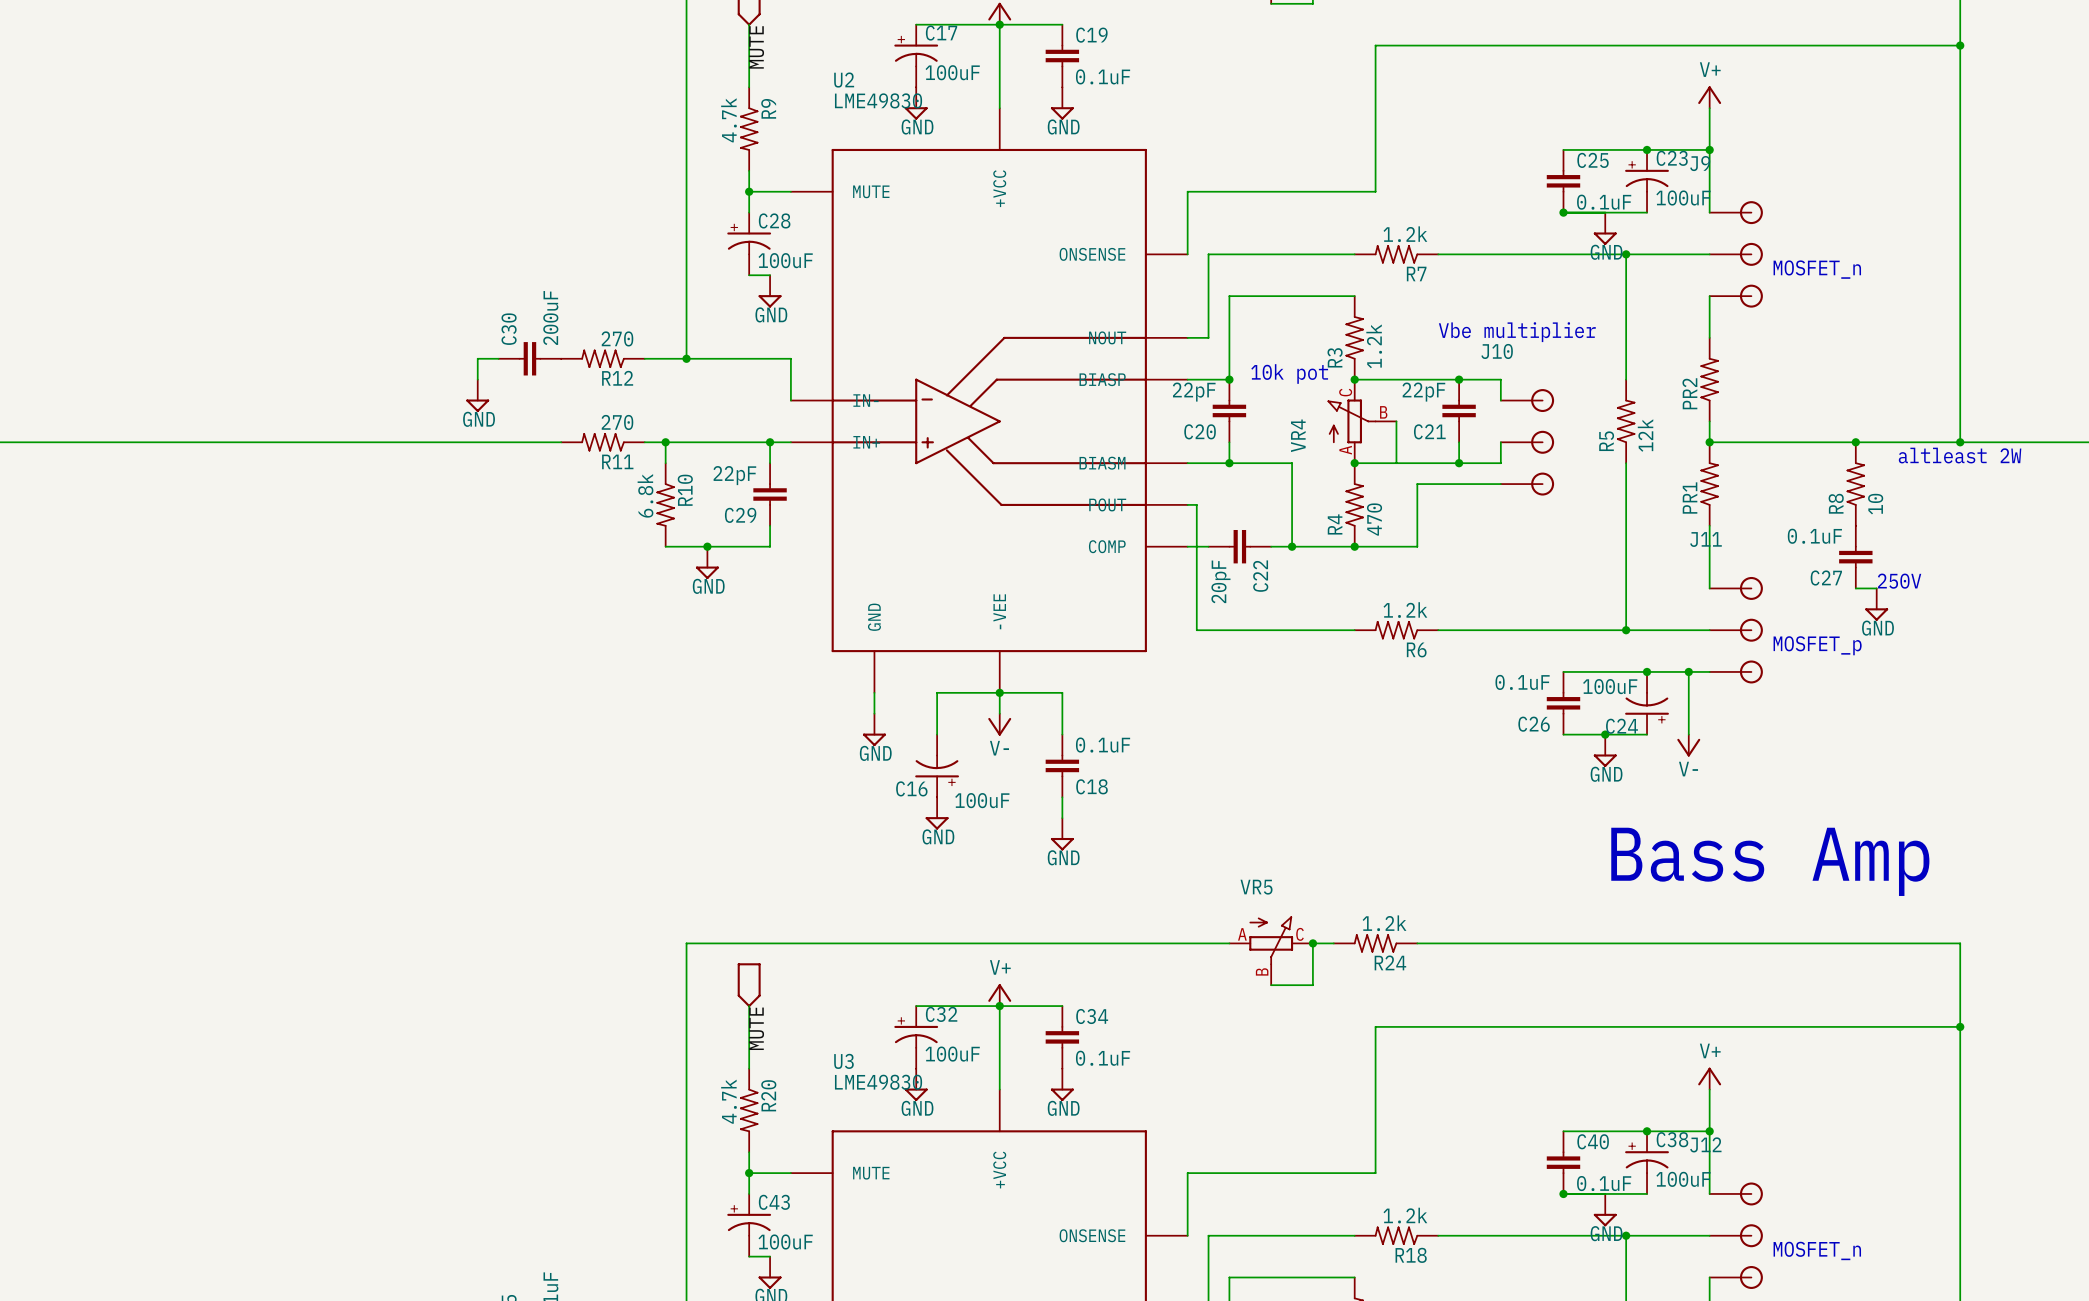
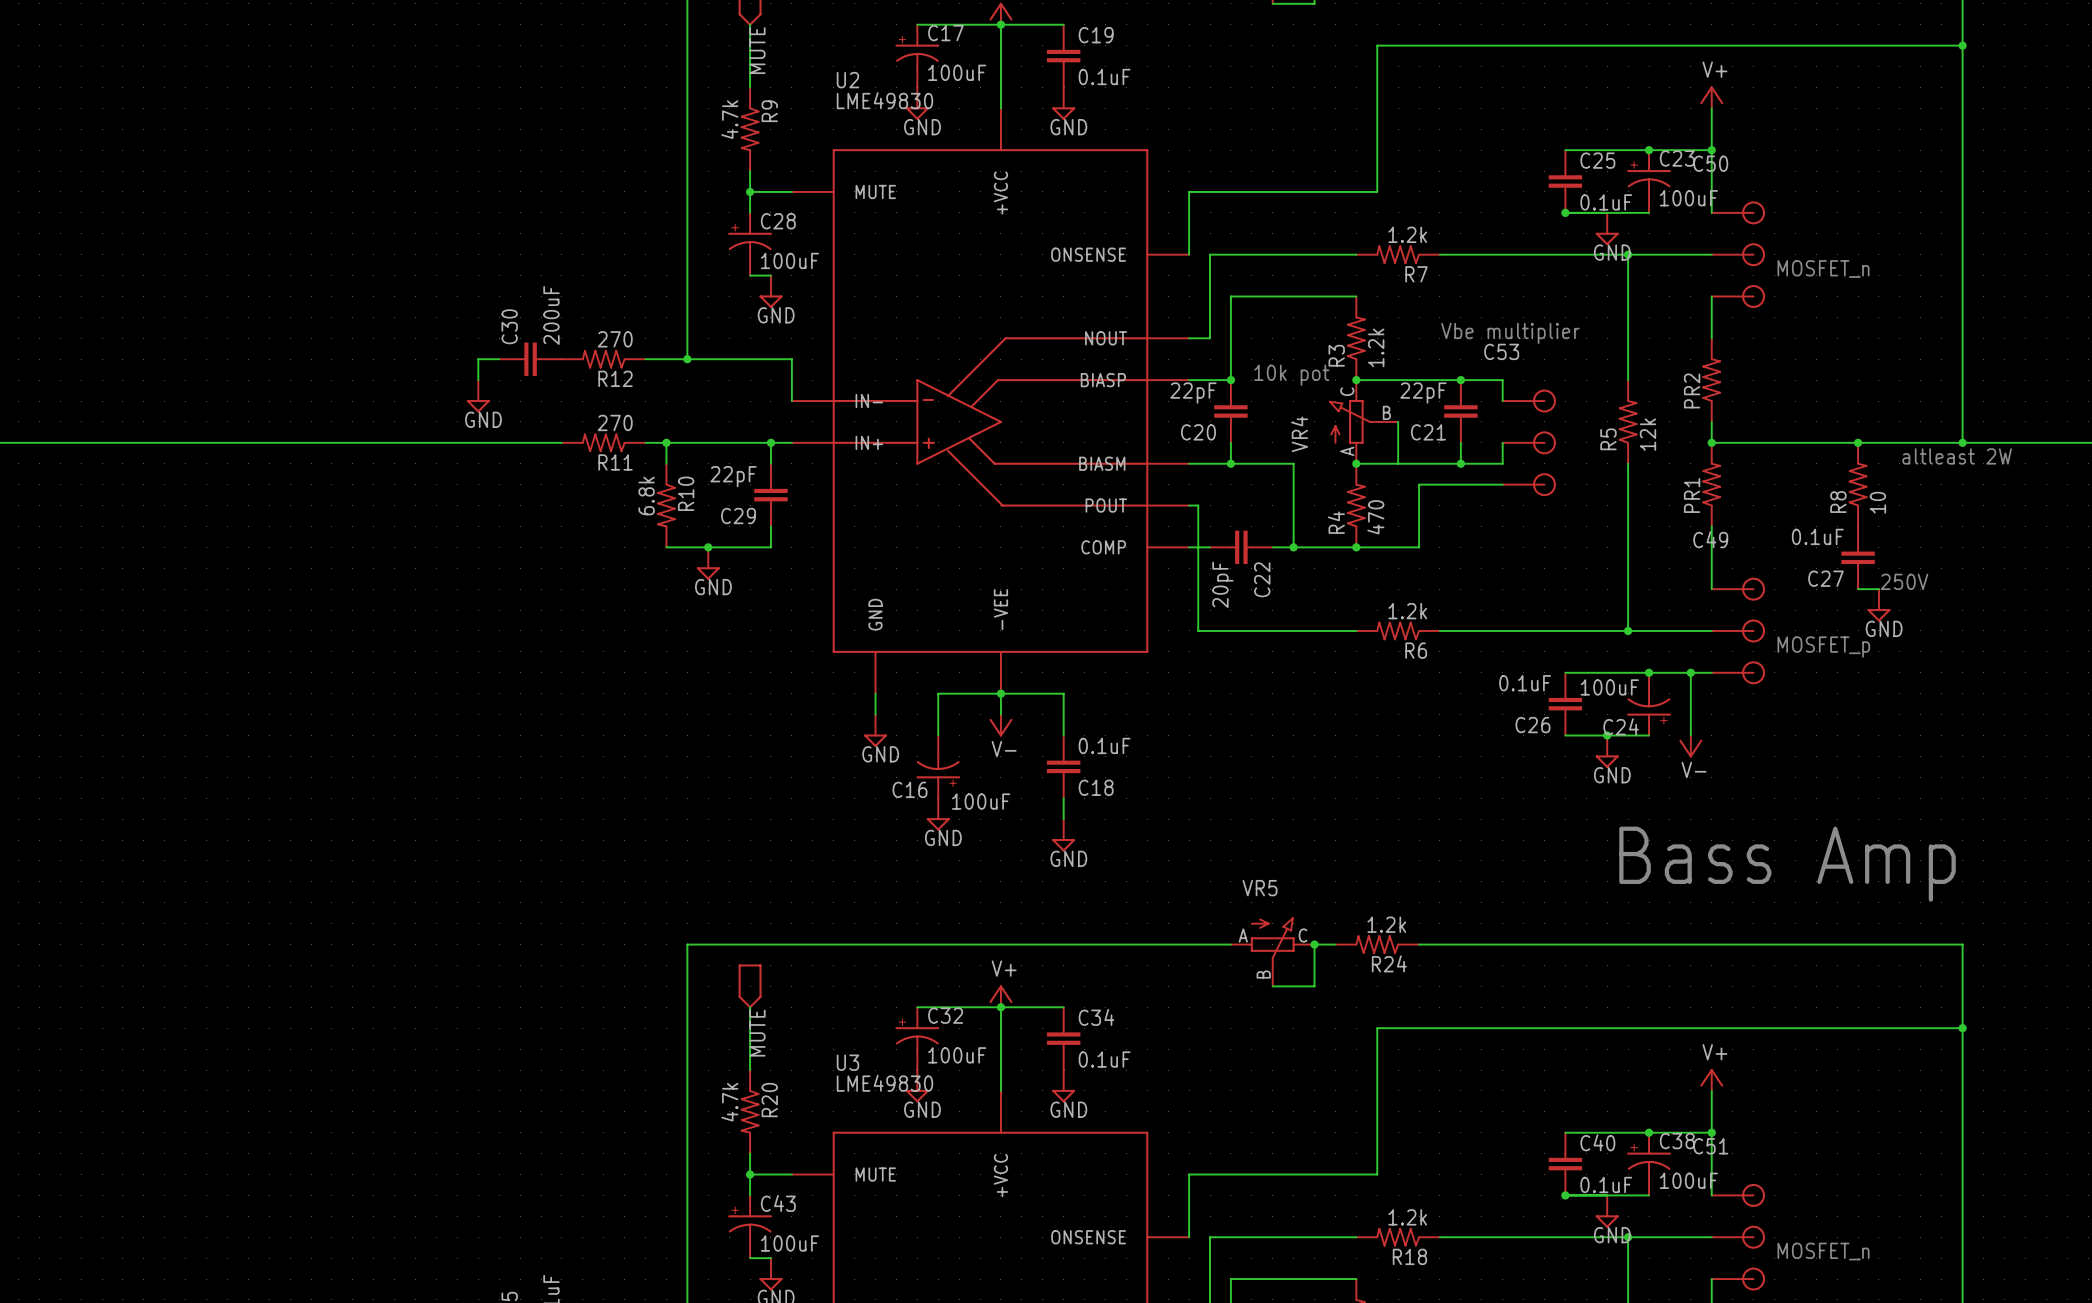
J9 name: J9 (1700, 163) -> C50 (1710, 163)
J10 name: J10 (1497, 351) -> C53 (1501, 351)
J11 name: J11 (1705, 539) -> C49 (1710, 539)
J12 name: J12 (1705, 1144) -> C51 (1710, 1146)

